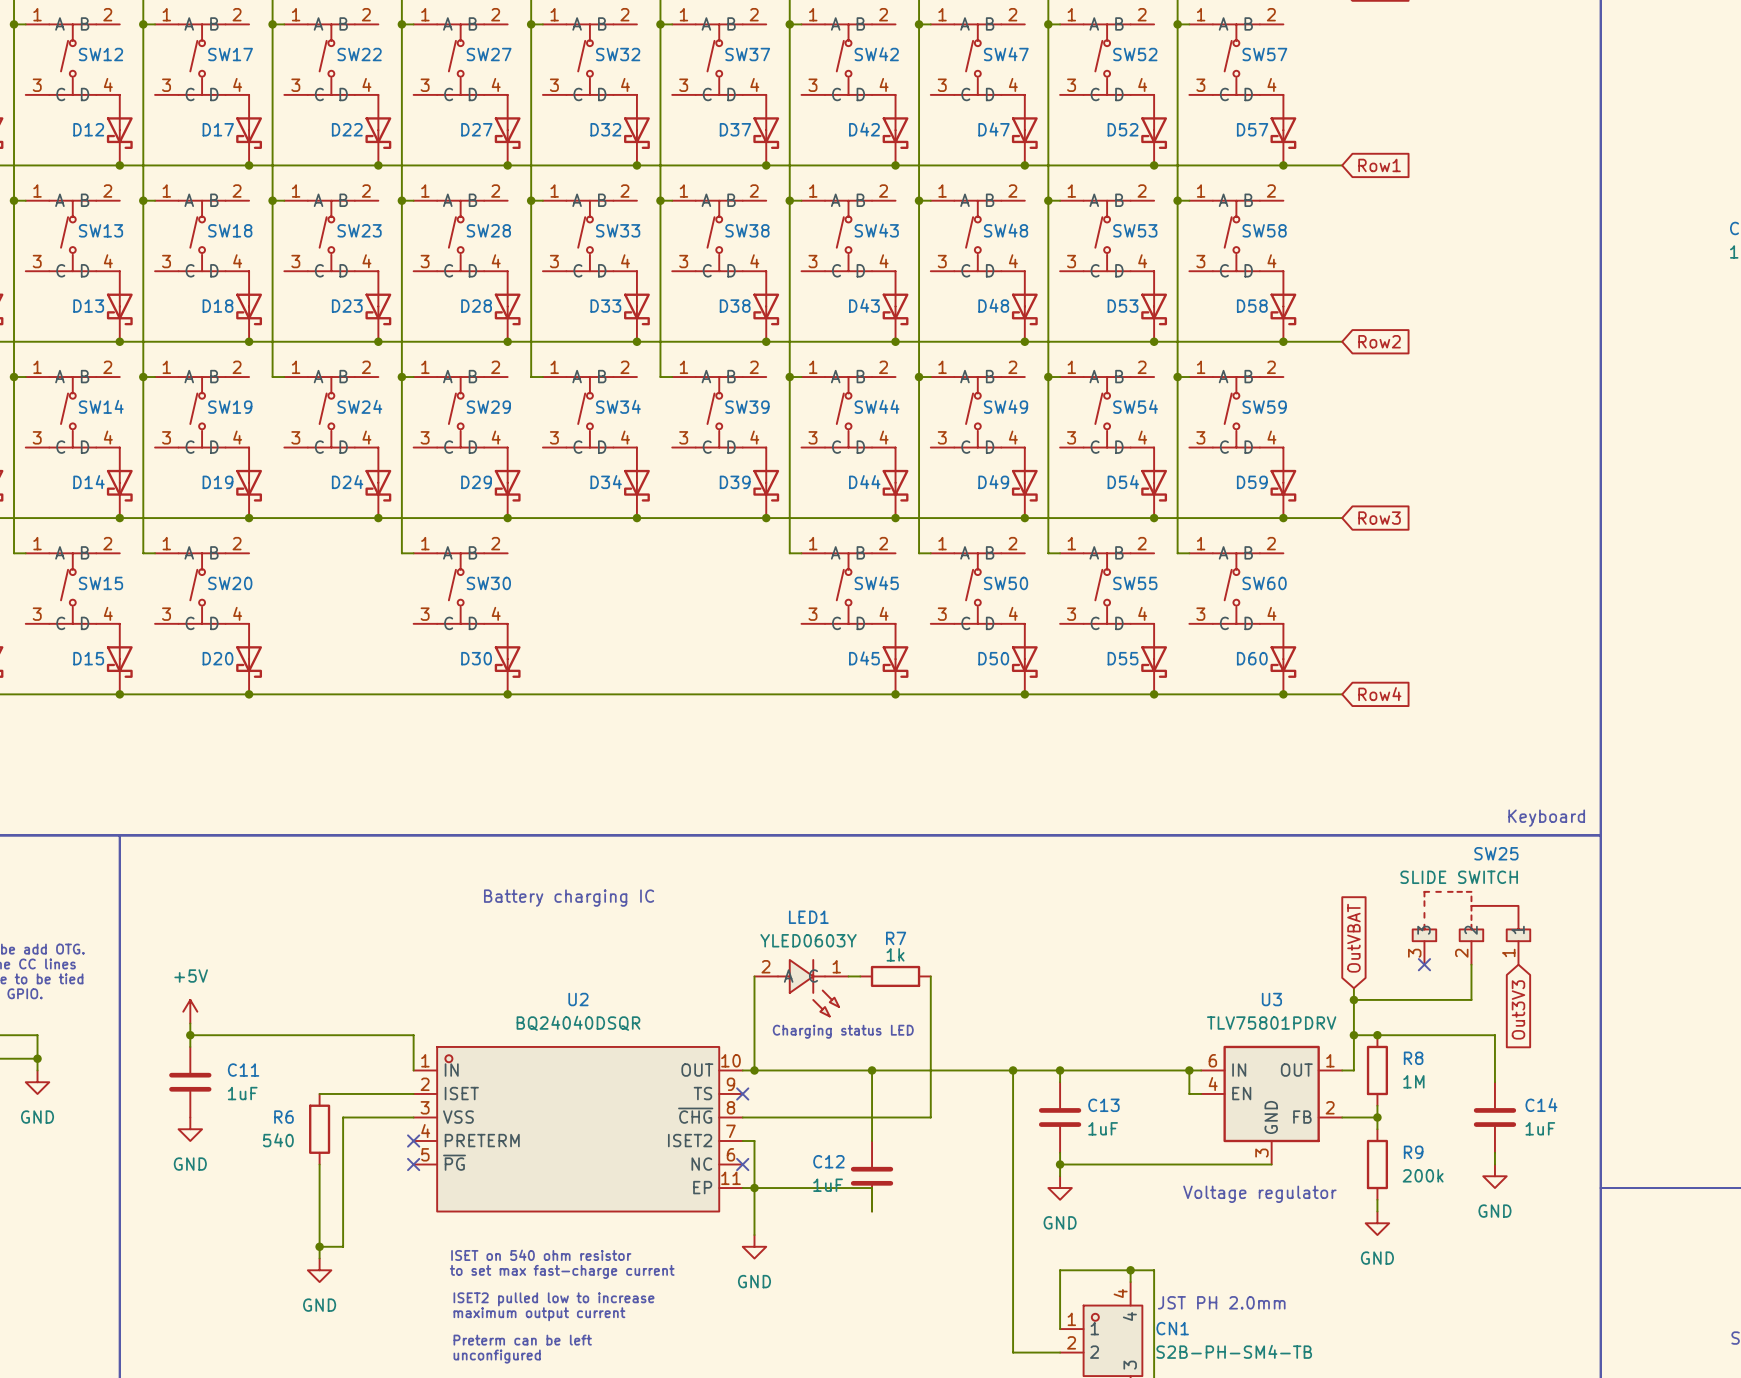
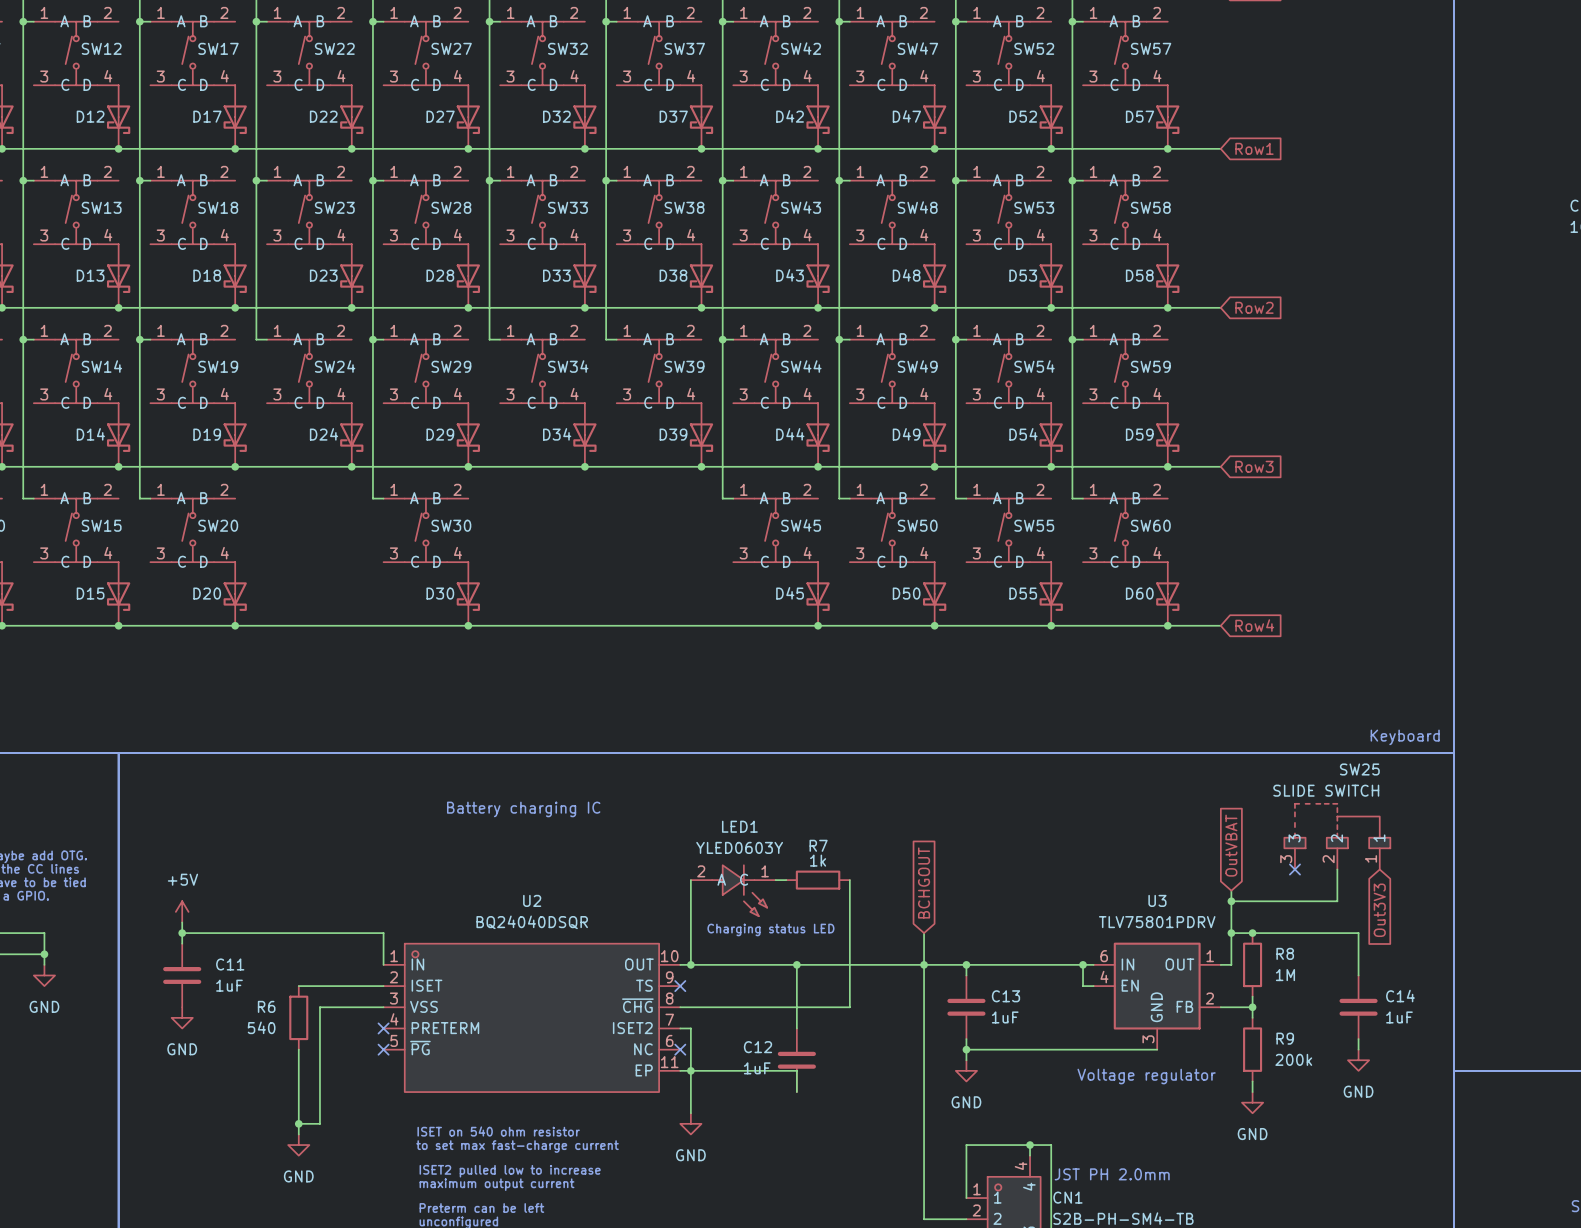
global label: none -> BCHGOUT (924, 882)
wire: none -> (924, 933) (924, 964)

